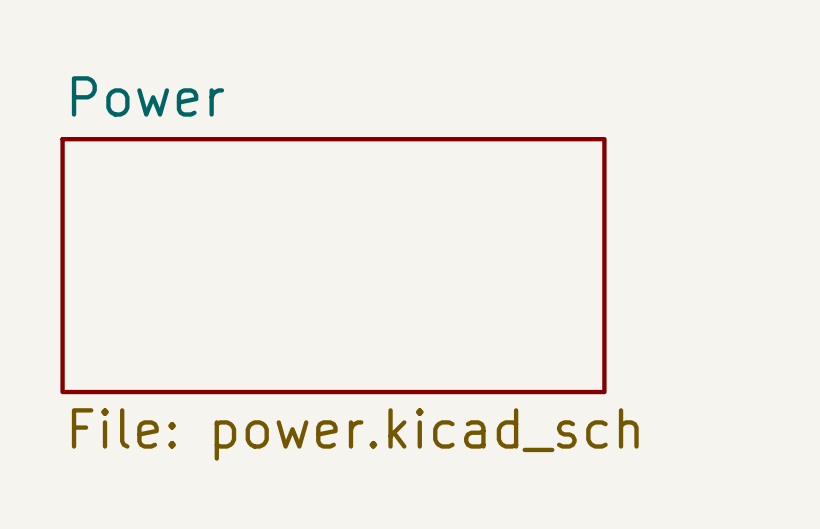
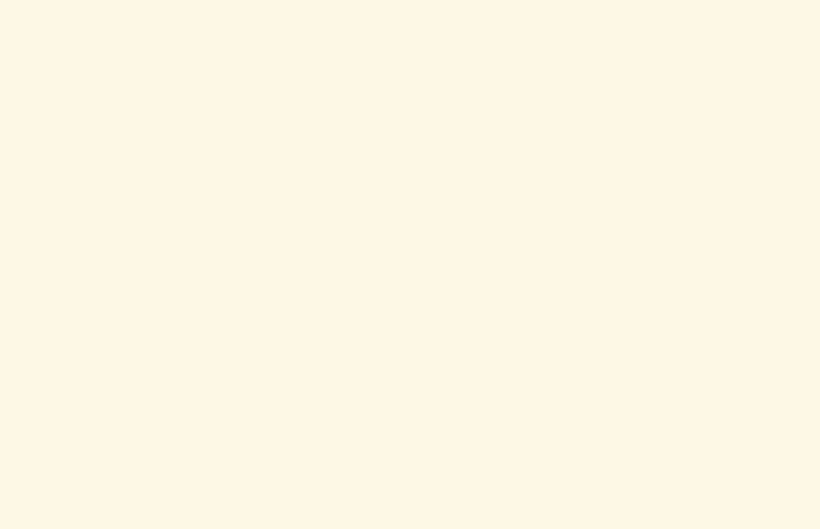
sheet Power: File: power.kicad_sch (333, 265) -> none

